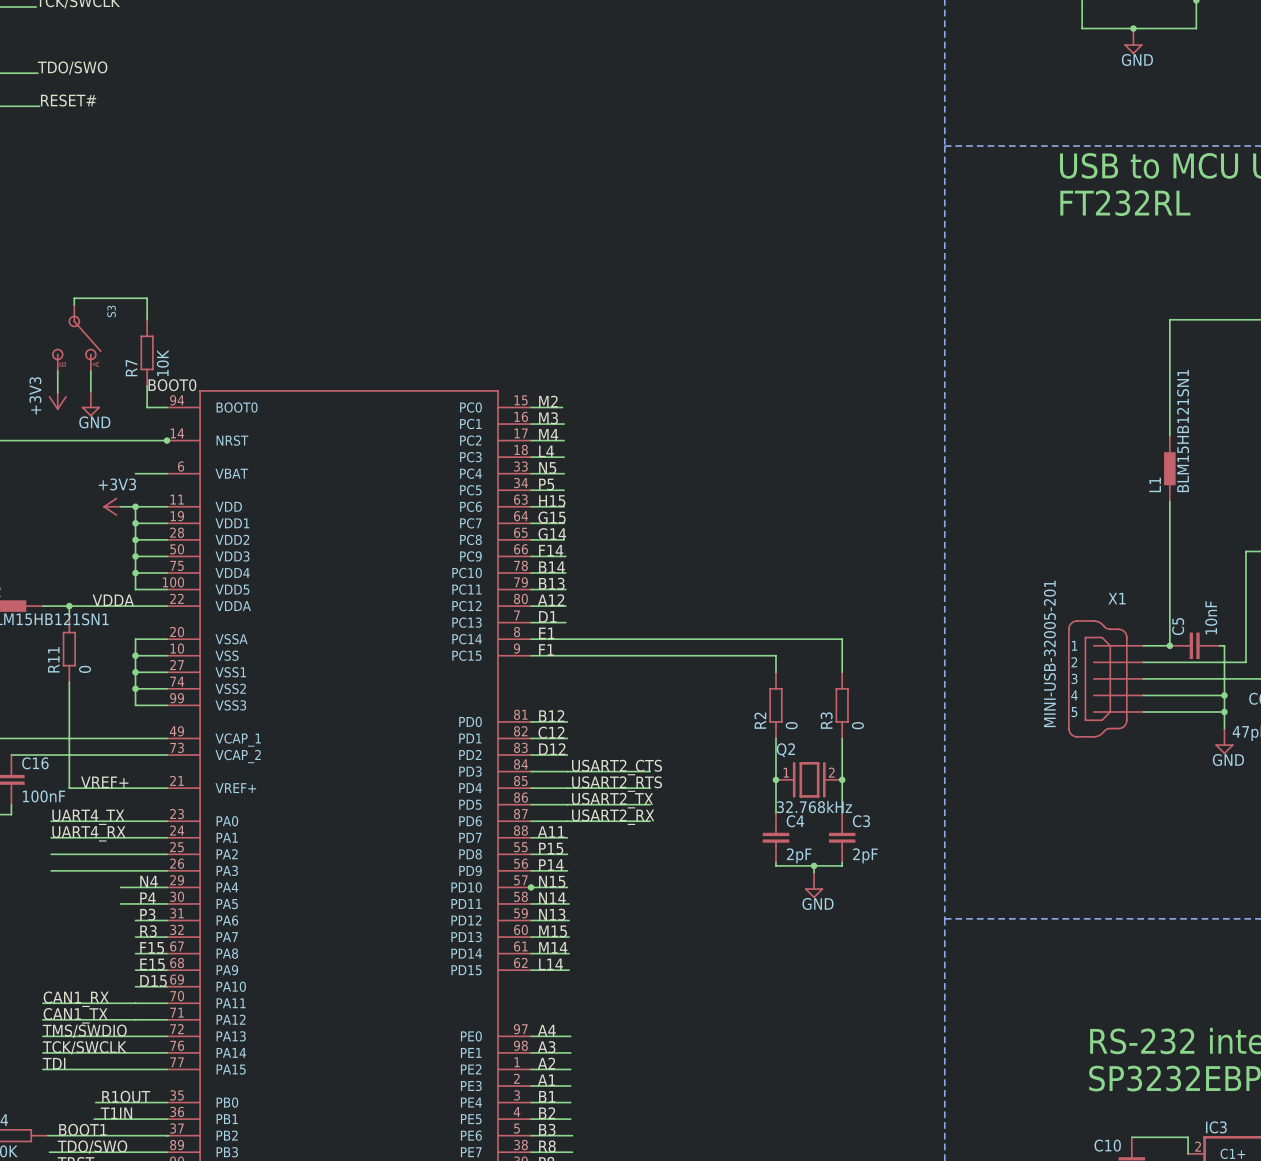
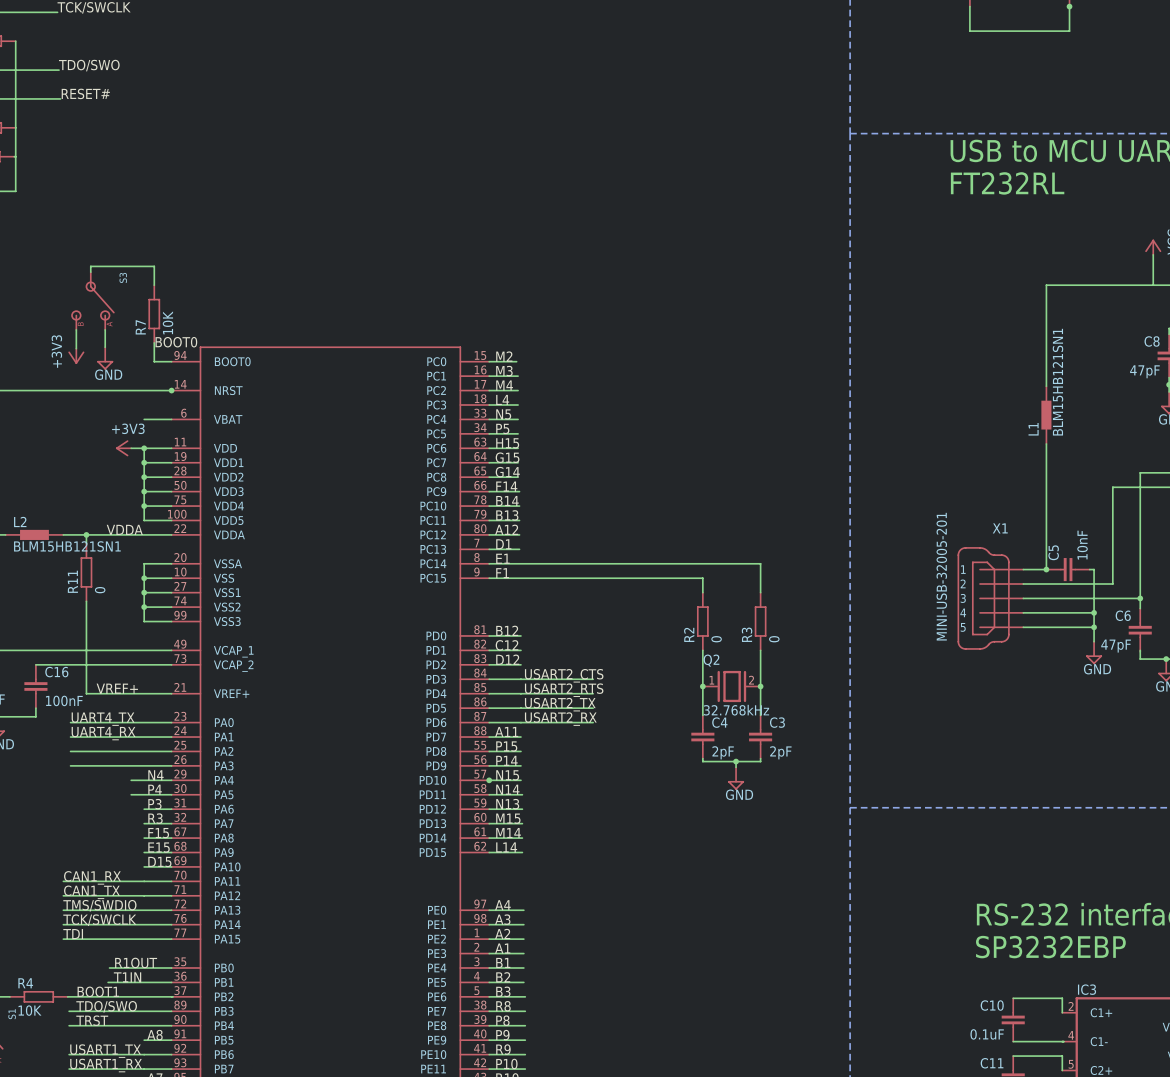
junction: (1133, 28) -> none
power symbol: GND (1133, 41) -> none

